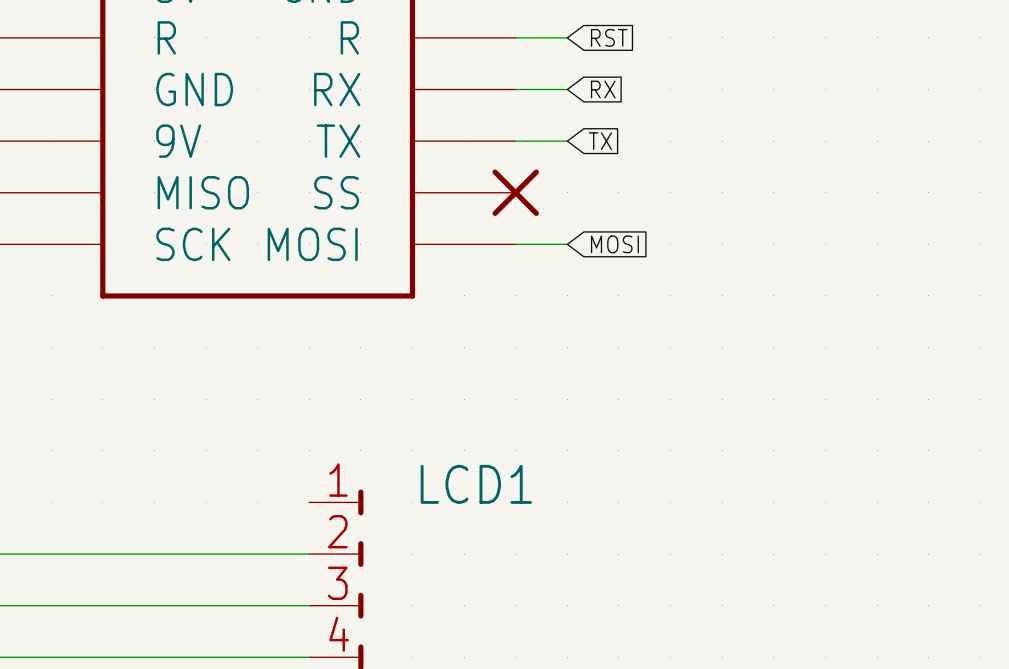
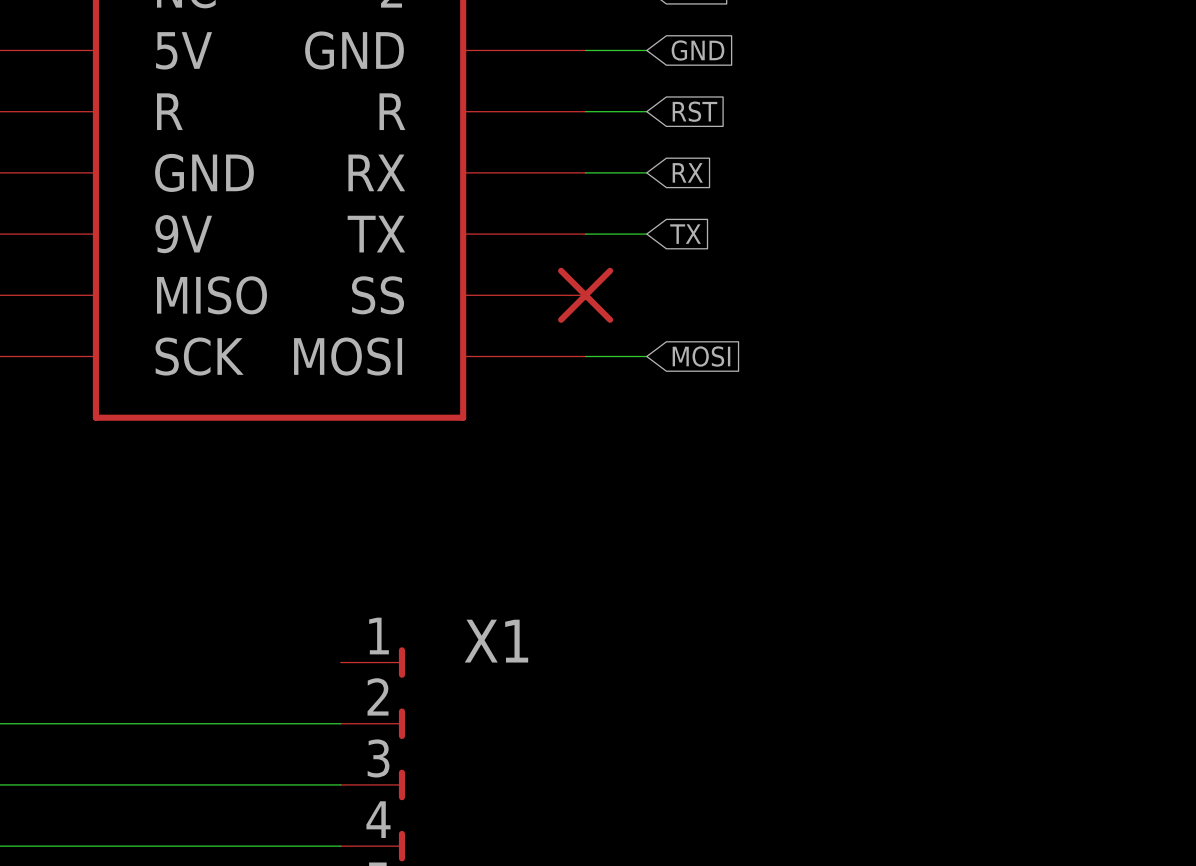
LCD1 name: LCD1 (476, 484) -> X1 (496, 641)

